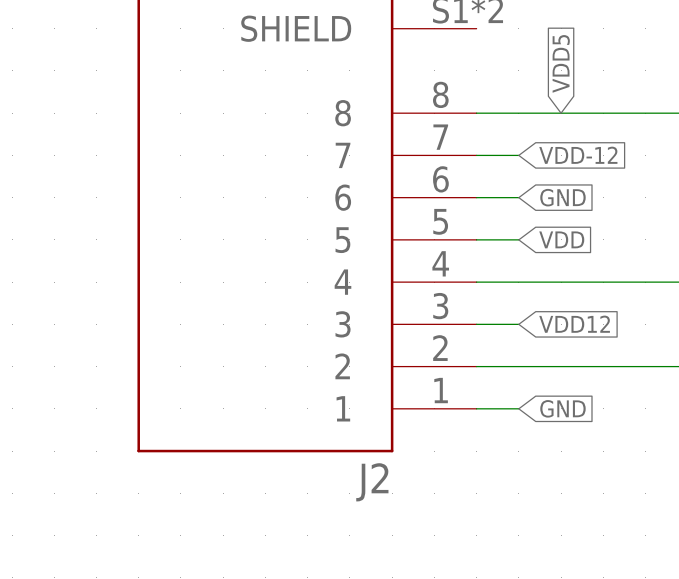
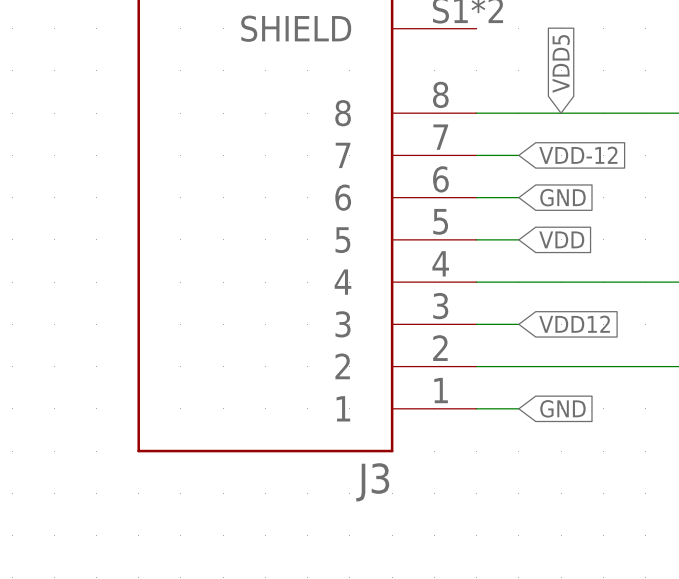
J2 name: J2 (372, 482) -> J3 (372, 482)

